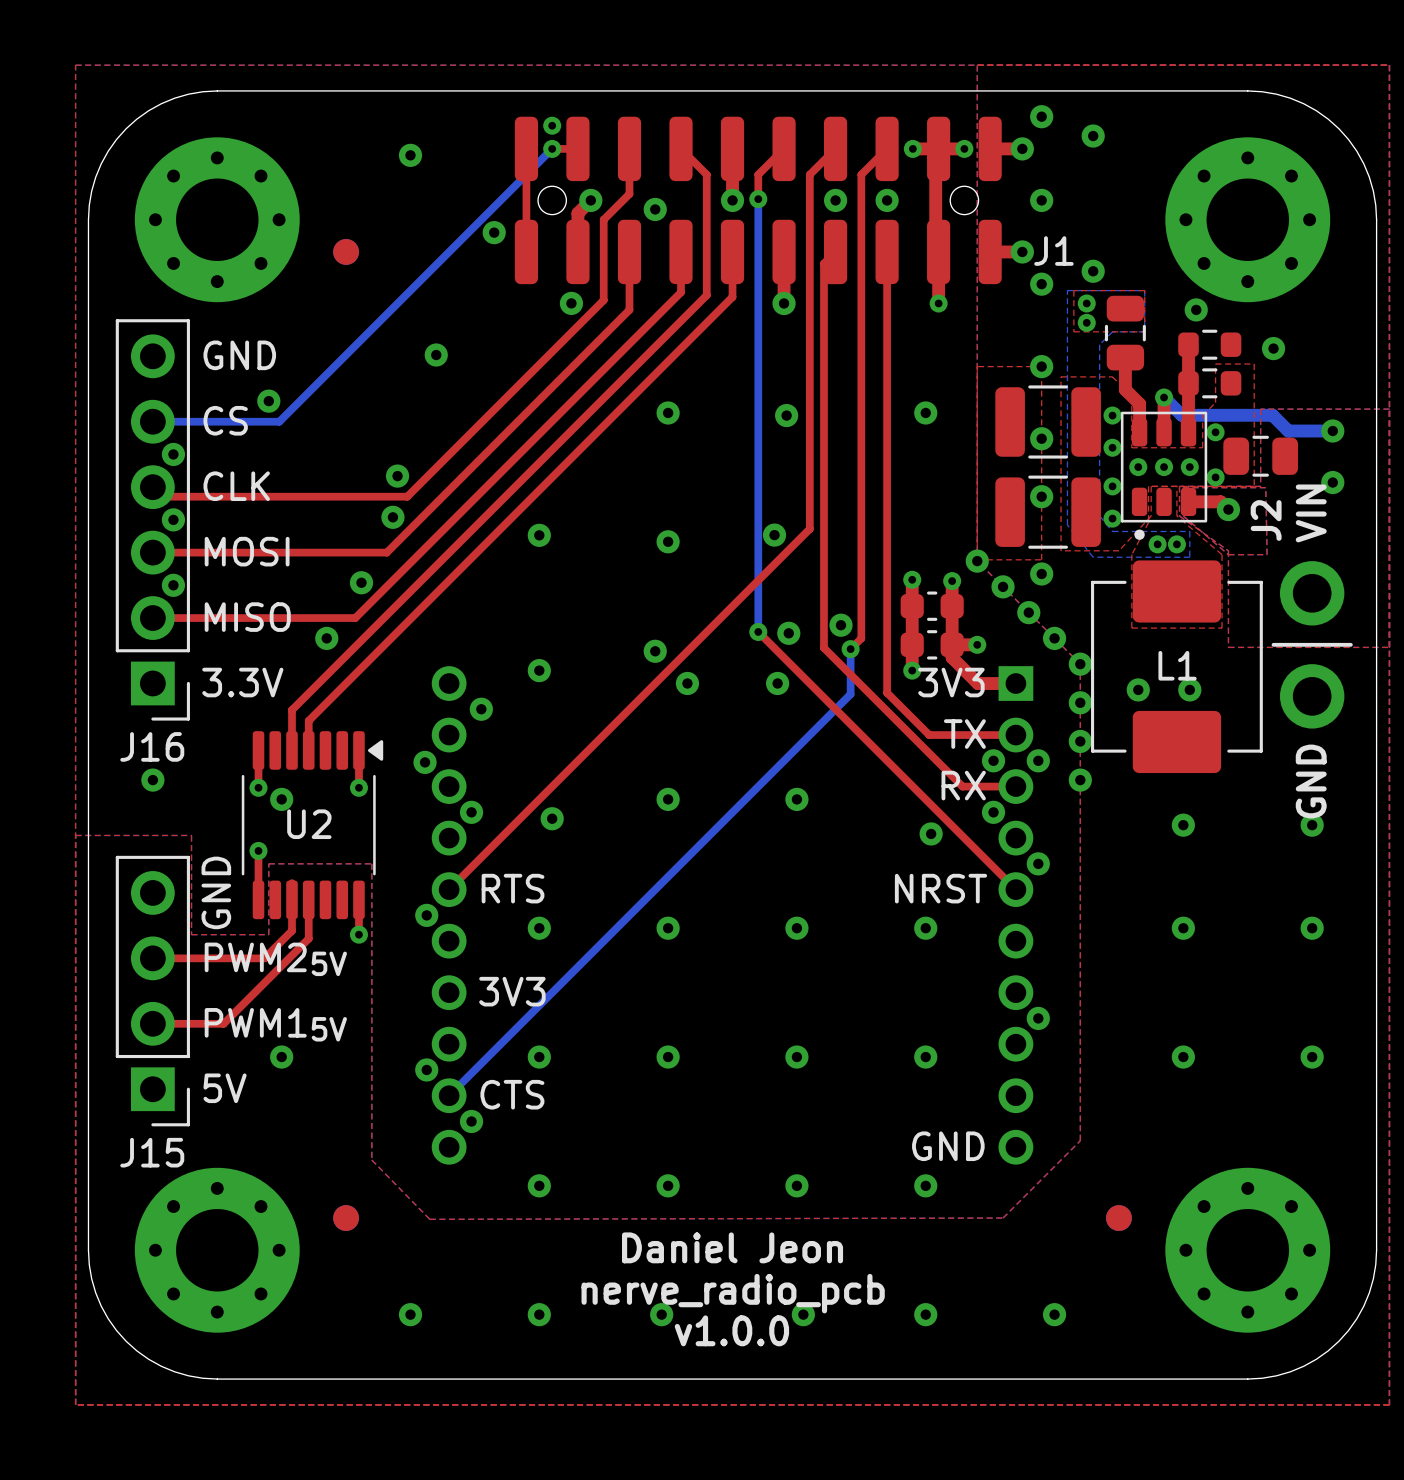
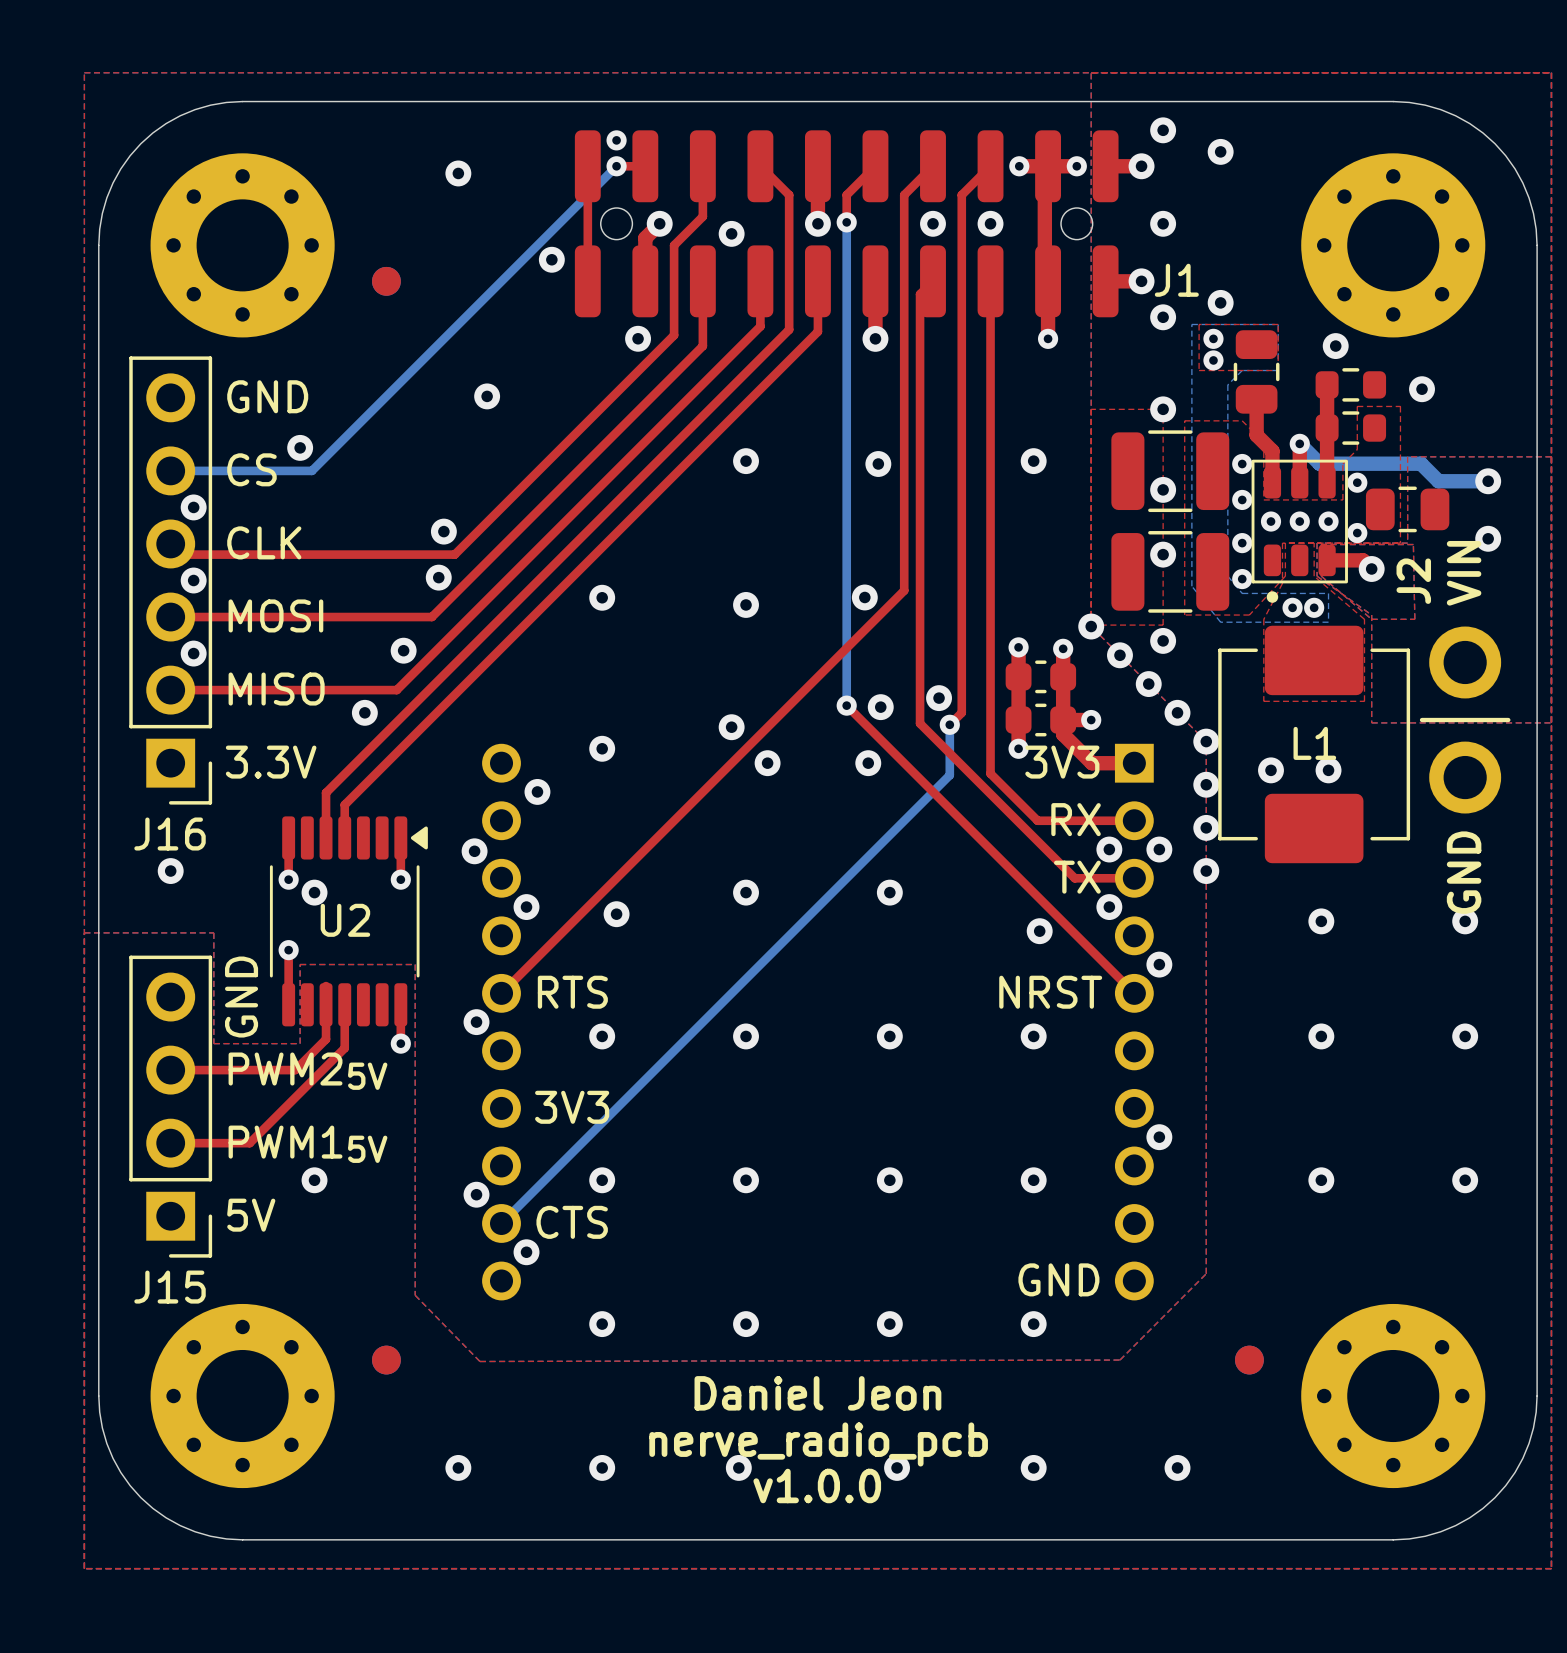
text: TX (964, 734) -> RX (1076, 819)
text: RX (963, 785) -> TX (1077, 877)

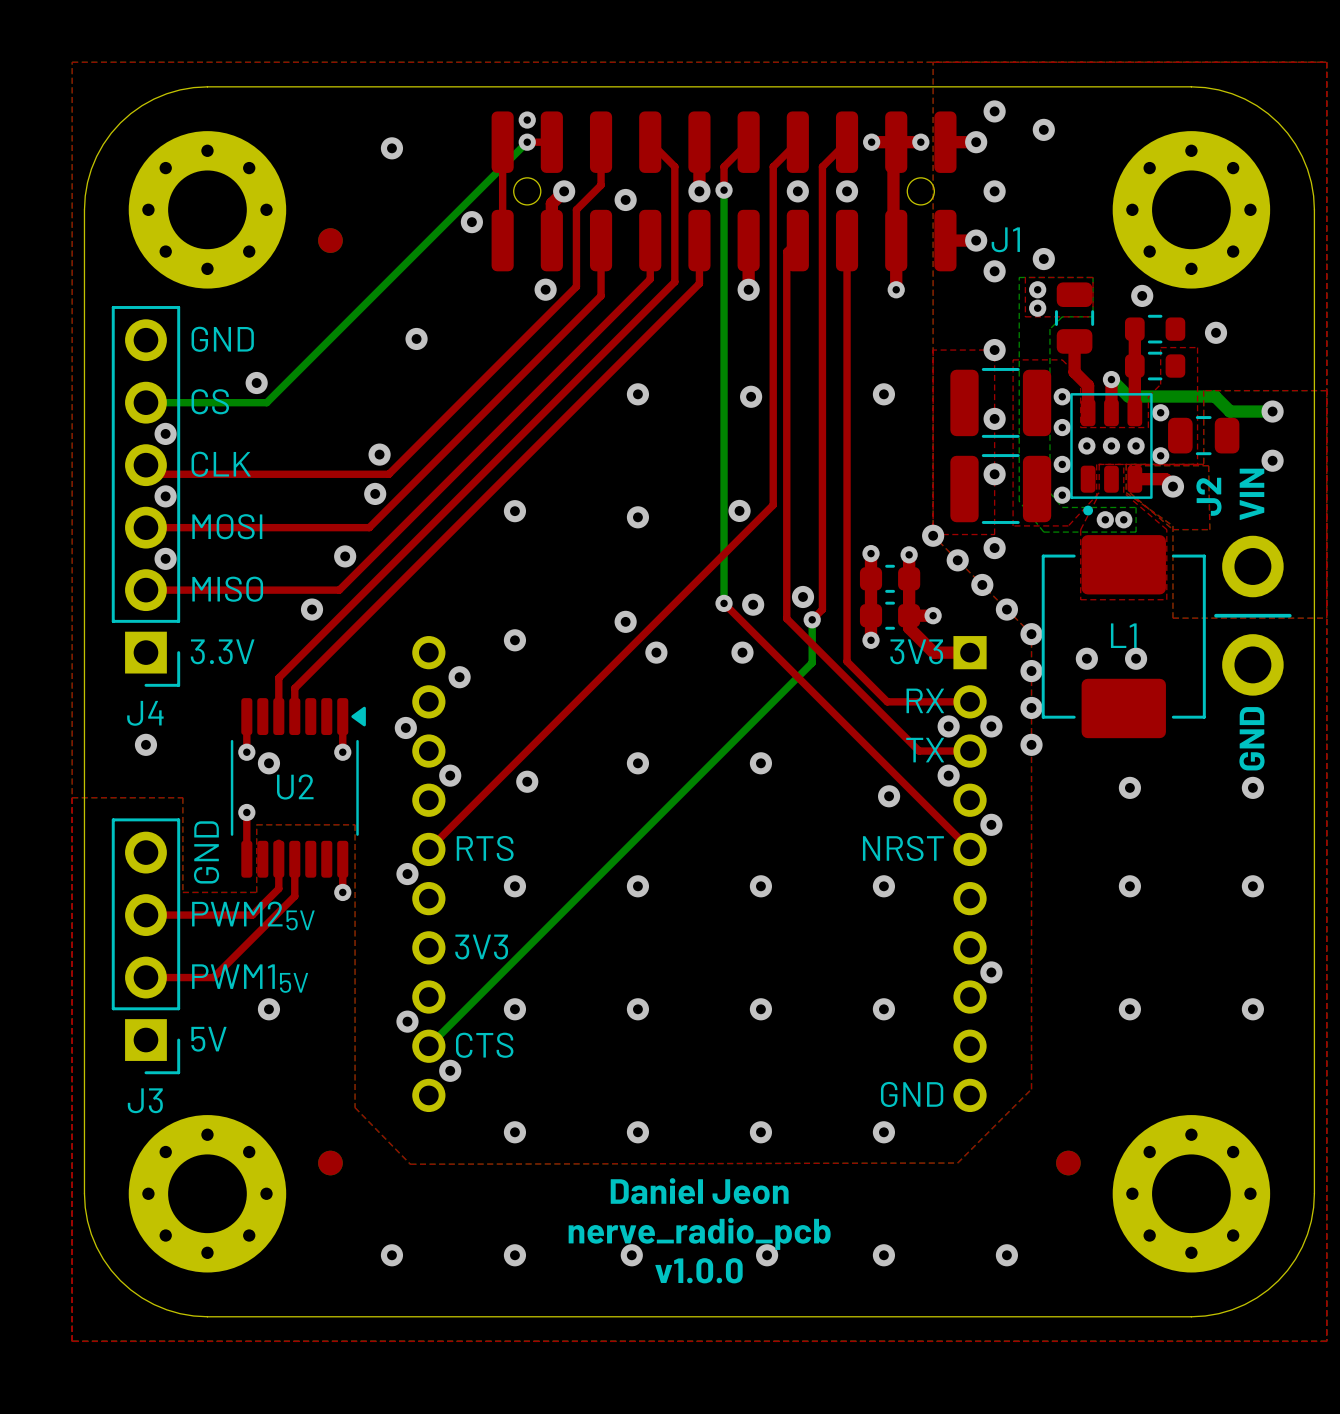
J16: (170, 580) -> none
J4: none -> (145, 496)
J15: (170, 1106) -> none
J3: none -> (145, 946)

